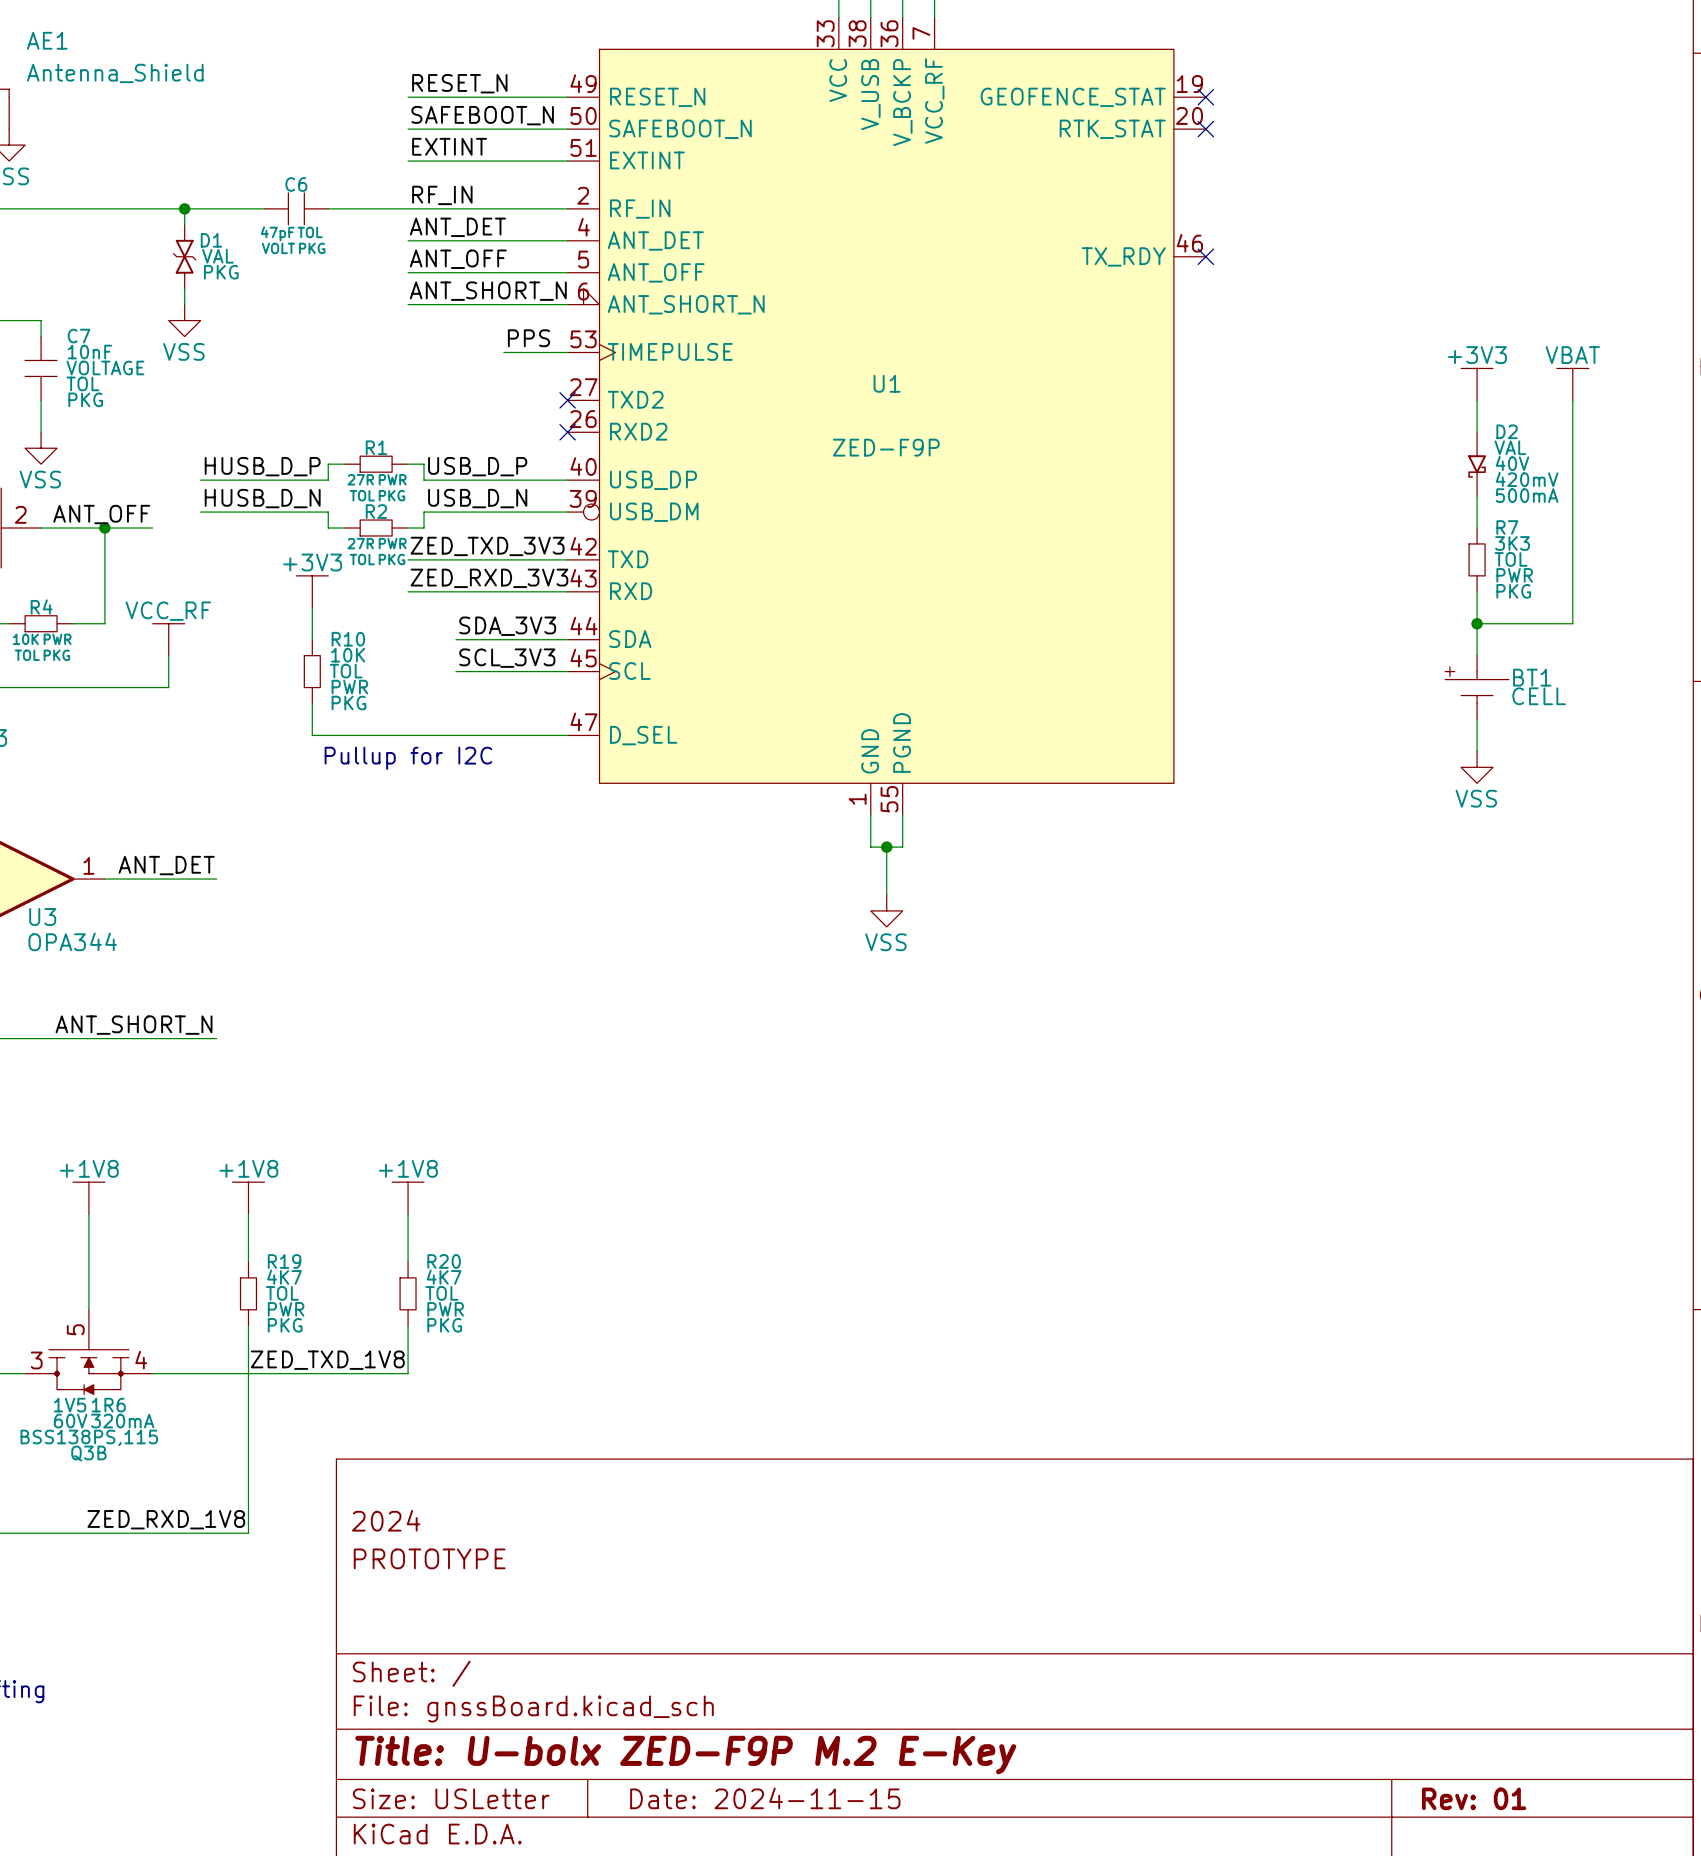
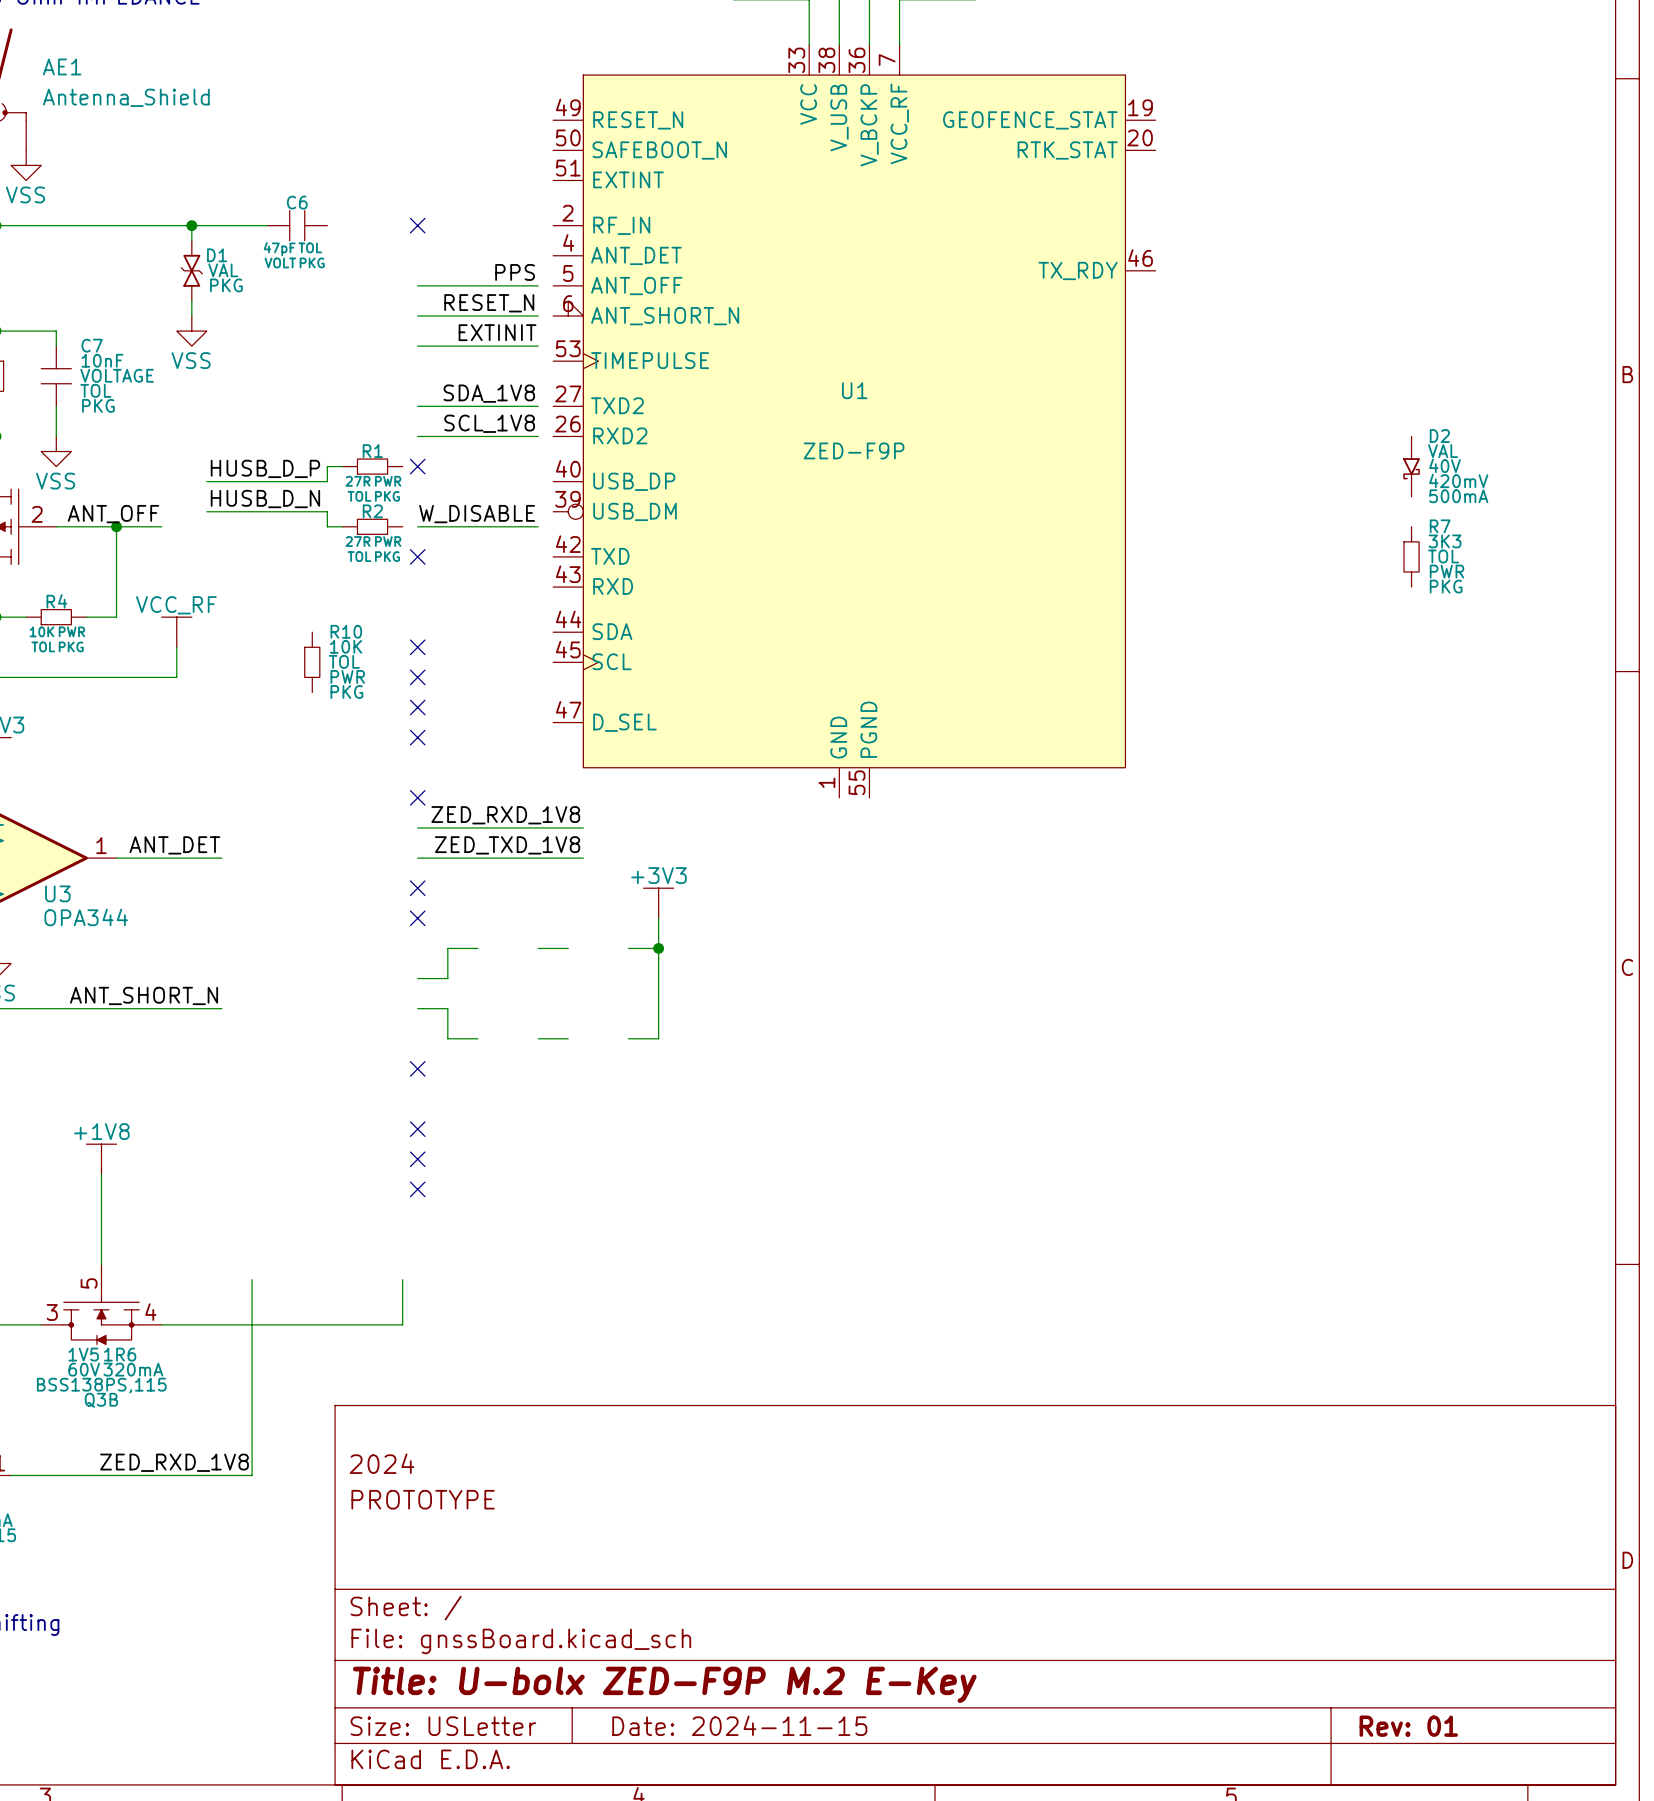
label position: RESET_N (459, 83) -> RESET_N (489, 303)
wire: (408, 97) (567, 97) -> none
no-connect mark: (1205, 97) -> none
label: SAFEBOOT_N (482, 115) -> none
wire: (408, 129) (567, 129) -> none
no-connect mark: (1205, 129) -> none
label: EXTINT (449, 146) -> none
wire: (408, 161) (567, 161) -> none
label: RF_IN (442, 195) -> none
wire: (328, 208) (567, 208) -> none
no-connect mark: none -> (417, 225)
label: ANT_DET (457, 227) -> none
wire: (408, 240) (567, 240) -> none
no-connect mark: (1205, 256) -> none
label: ANT_OFF (458, 259) -> none
wire: (408, 272) (424, 272) -> none
wire: (551, 272) (567, 272) -> none
label: ANT_SHORT_N (488, 291) -> none
wire: (408, 304) (424, 304) -> none
wire: (551, 304) (567, 304) -> none
label: none -> EXTINIT (497, 332)
wire: none -> (417, 346) (538, 346)
label position: PPS (528, 338) -> PPS (515, 272)
wire: (503, 352) (567, 352) -> none
power symbol: +3V3 (1477, 384) -> none
power symbol: VBAT (1572, 384) -> none
label: none -> SDA_1V8 (489, 393)
wire: none -> (417, 406) (538, 406)
no-connect mark: (567, 400) -> none
wire: (1477, 400) (1477, 432) -> none
wire: (1572, 400) (1572, 623) (1477, 623) -> none
label: none -> SCL_1V8 (489, 423)
wire: none -> (417, 436) (538, 436)
no-connect mark: (567, 432) -> none
wire: (408, 464) (424, 464) (424, 480) (567, 480) -> none
no-connect mark: none -> (417, 466)
label: USB_D_P (477, 466) -> none
wire: (1477, 496) (1477, 528) -> none
label: USB_D_N (477, 498) -> none
wire: (567, 512) (424, 512) (424, 528) (408, 528) -> none
label: none -> W_DISABLE (477, 514)
wire: none -> (417, 526) (538, 526)
label: ZED_TXD_3V3 (487, 546) -> none
wire: (408, 559) (567, 559) -> none
no-connect mark: none -> (417, 556)
label: ZED_RXD_3V3 (489, 578) -> none
power symbol: +3V3 (312, 591) -> none
wire: (408, 591) (567, 591) -> none
wire: (1477, 591) (1477, 655) -> none
wire: (312, 607) (312, 639) -> none
junction: (1477, 623) -> none
label: SDA_3V3 (507, 626) -> none
wire: (455, 639) (567, 639) -> none
no-connect mark: none -> (417, 647)
label: SCL_3V3 (507, 658) -> none
wire: (455, 671) (567, 671) -> none
no-connect mark: none -> (417, 677)
BT1: (1477, 687) -> none
wire: (312, 703) (312, 735) (567, 735) -> none
no-connect mark: none -> (417, 707)
wire: (1477, 719) (1477, 751) -> none
no-connect mark: none -> (417, 737)
text: Pullup for I2C (408, 758) -> none
power symbol: VSS (1477, 767) -> none
no-connect mark: none -> (417, 797)
wire: (870, 815) (870, 847) (902, 847) (902, 815) -> none
label: none -> ZED_RXD_1V8 (505, 815)
wire: none -> (417, 827) (583, 827)
wire: (886, 847) (886, 894) -> none
junction: (886, 847) -> none
label: none -> ZED_TXD_1V8 (507, 845)
wire: none -> (417, 858) (583, 858)
no-connect mark: none -> (417, 888)
power symbol: VSS (886, 910) -> none
power symbol: none -> +3V3 (658, 903)
no-connect mark: none -> (417, 918)
wire: none -> (658, 918) (658, 1038) (628, 1038)
wire: none -> (477, 948) (447, 948) (447, 978) (417, 978)
wire: none -> (538, 948) (568, 948)
wire: none -> (628, 948) (658, 948)
junction: none -> (658, 948)
wire: none -> (417, 1008) (447, 1008) (447, 1038) (477, 1038)
wire: none -> (538, 1038) (568, 1038)
no-connect mark: none -> (417, 1068)
no-connect mark: none -> (417, 1129)
power symbol: +1V8 (248, 1198) -> none
power symbol: +1V8 (408, 1198) -> none
no-connect mark: none -> (417, 1159)
wire: (248, 1214) (248, 1261) -> none
wire: (408, 1214) (408, 1261) -> none
no-connect mark: none -> (417, 1189)
R19: 4K7 (248, 1293) -> none
R20: 4K7 (408, 1293) -> none
label: ZED_TXD_1V8 (327, 1360) -> none

